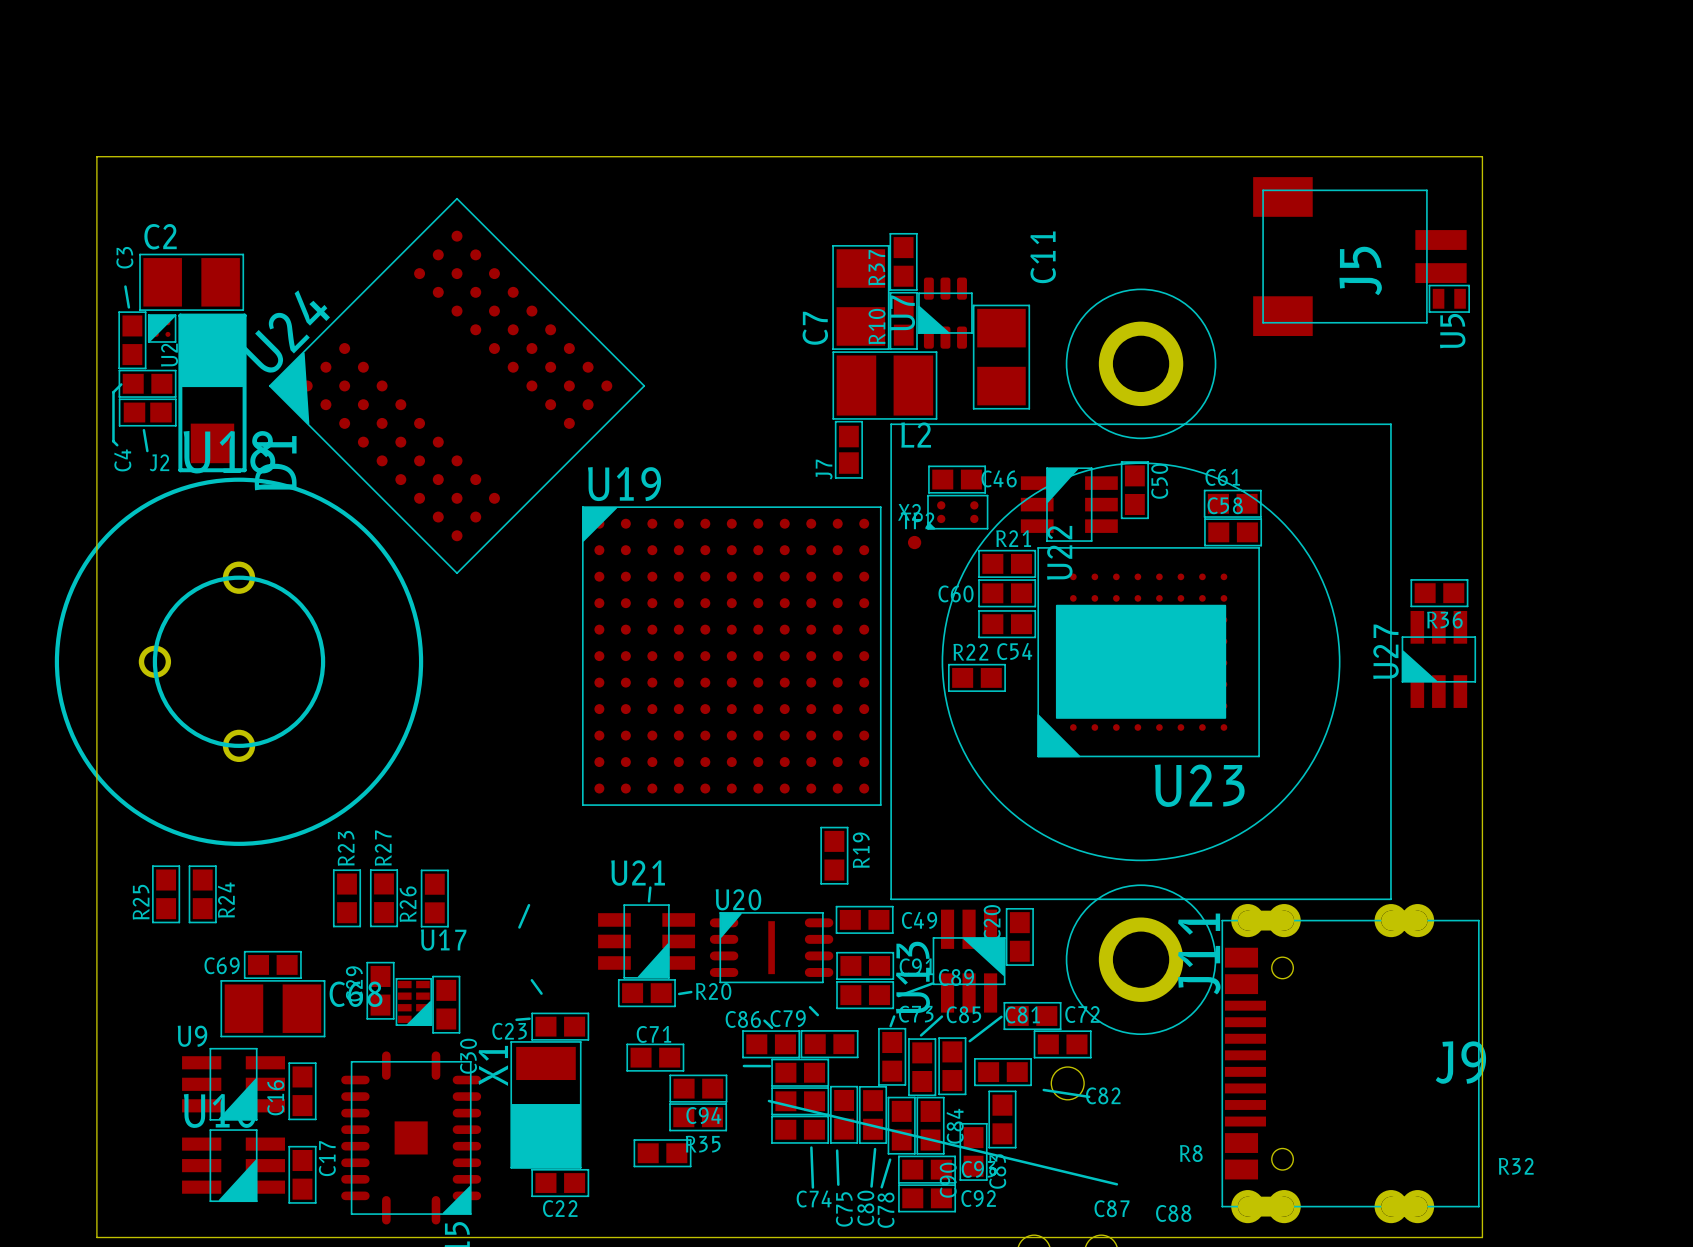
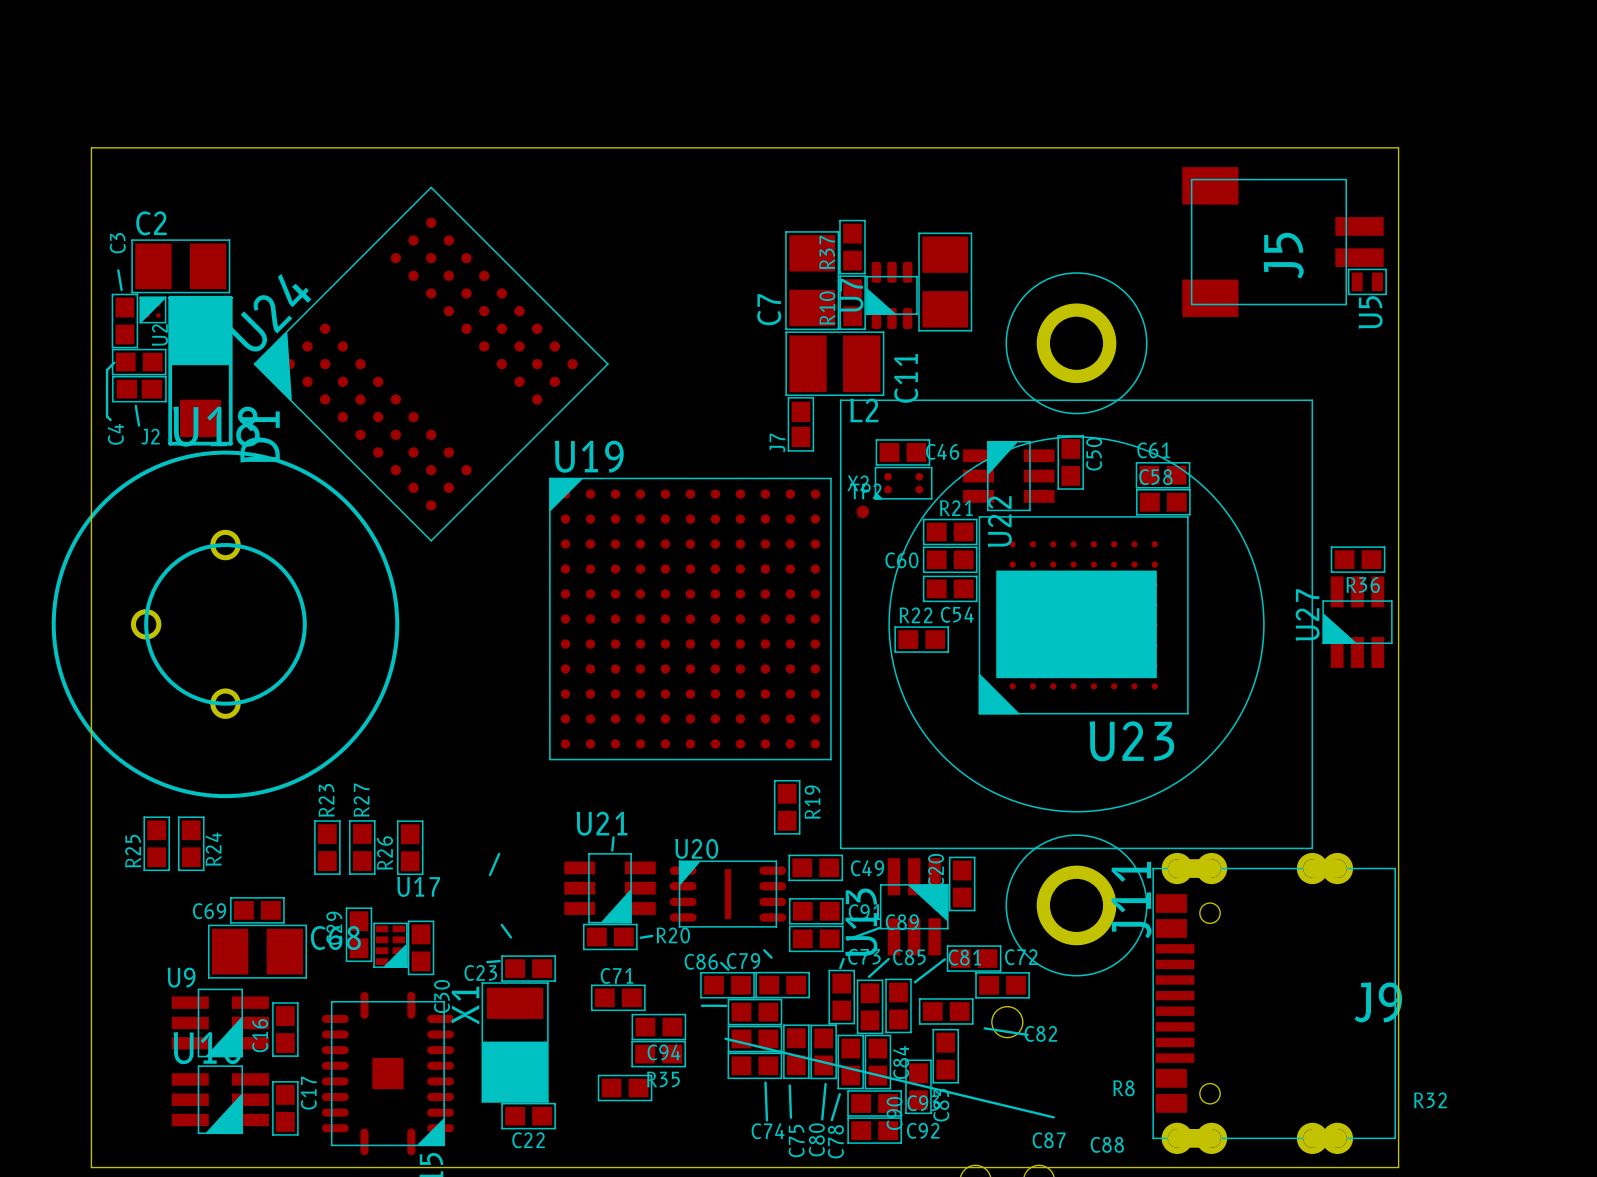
C11 name position: C11 (1043, 257) -> C11 (906, 378)
C11 position: (1001, 357) -> (945, 282)

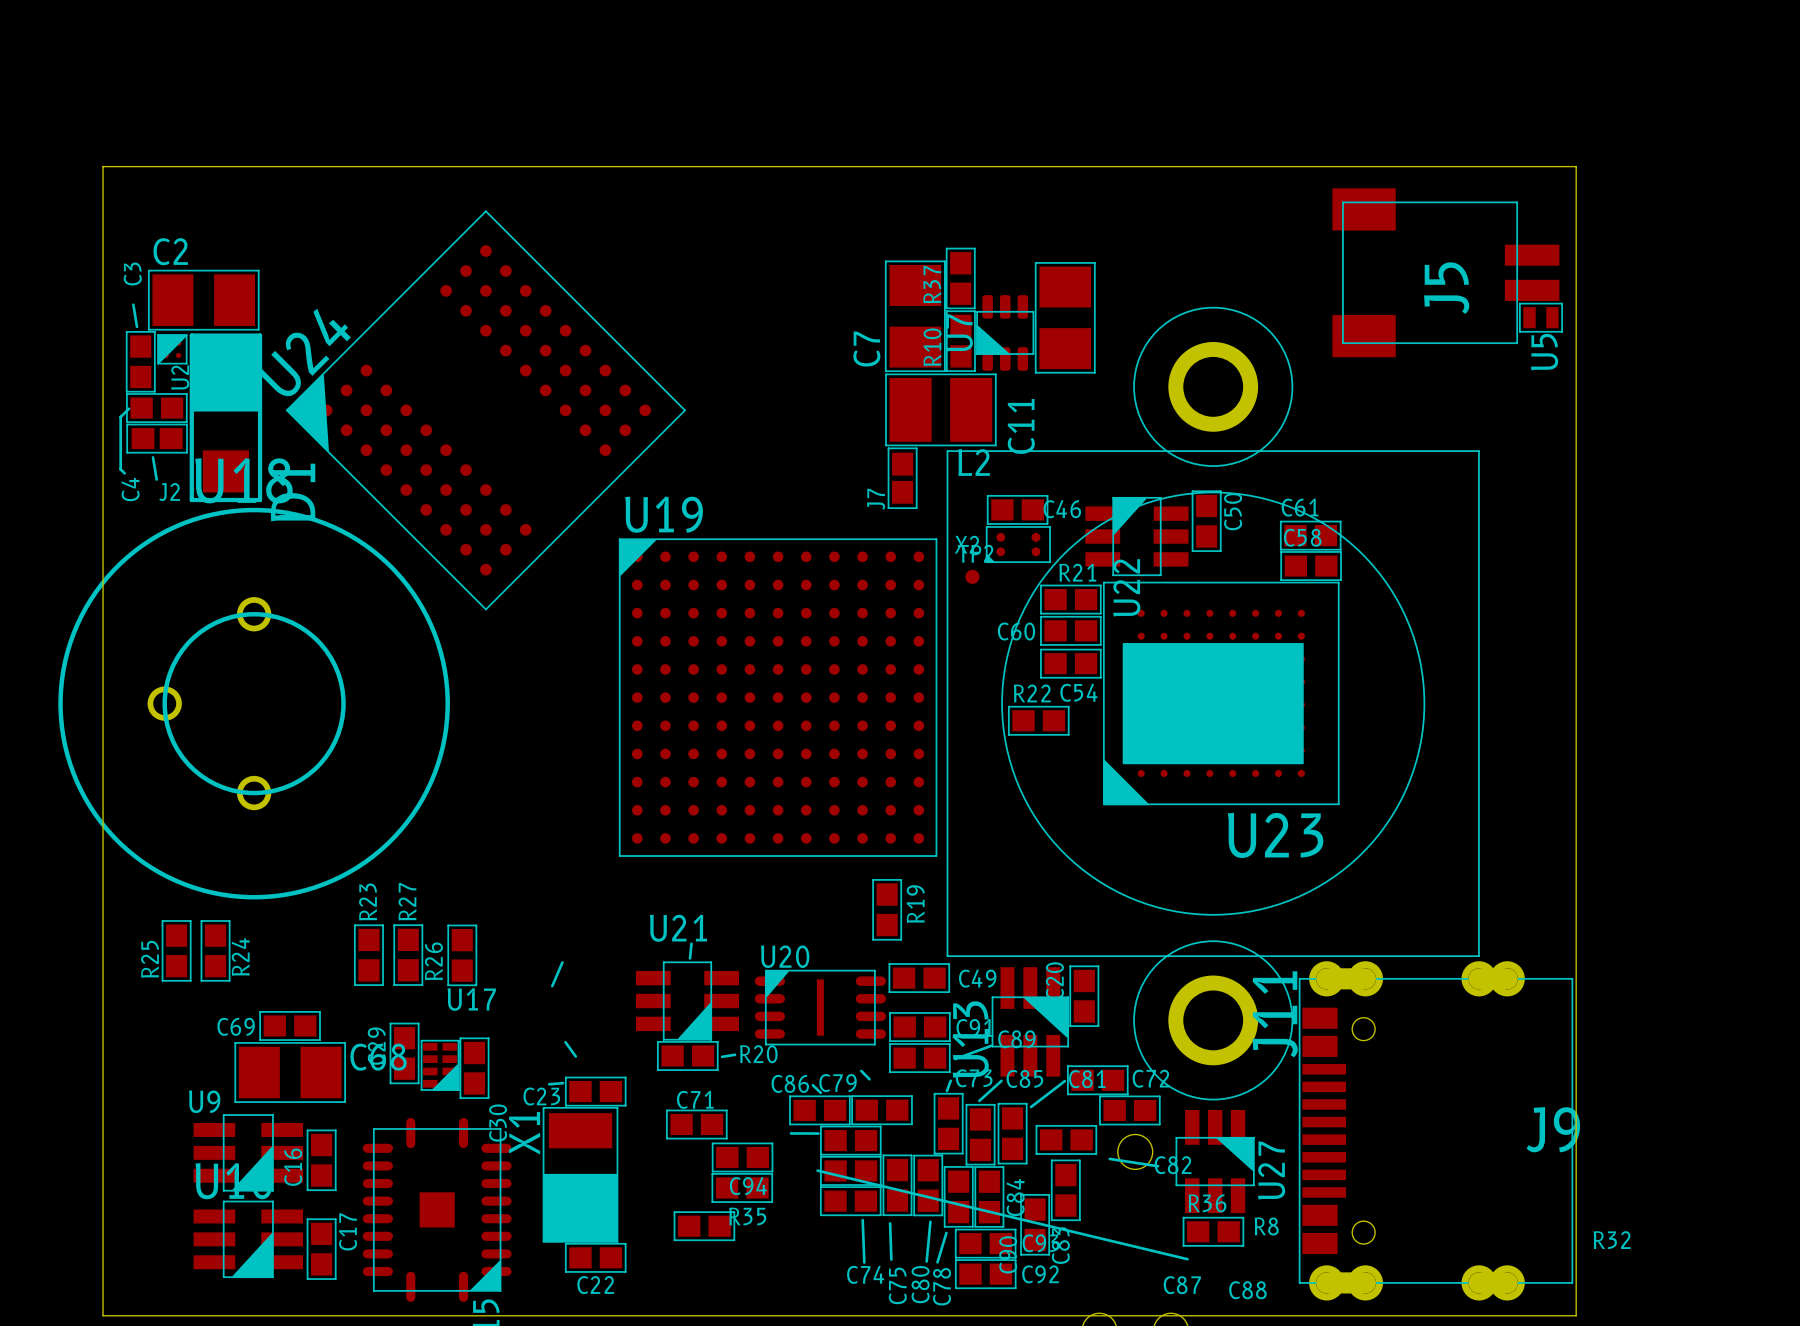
R36 position: (1358, 559) -> (1213, 1231)
R36 name position: R36 (1363, 585) -> R36 (1207, 1203)
U27 rotation: 0° (1357, 622) -> 180° (1215, 1161)
U27 position: (1357, 622) -> (1215, 1161)

